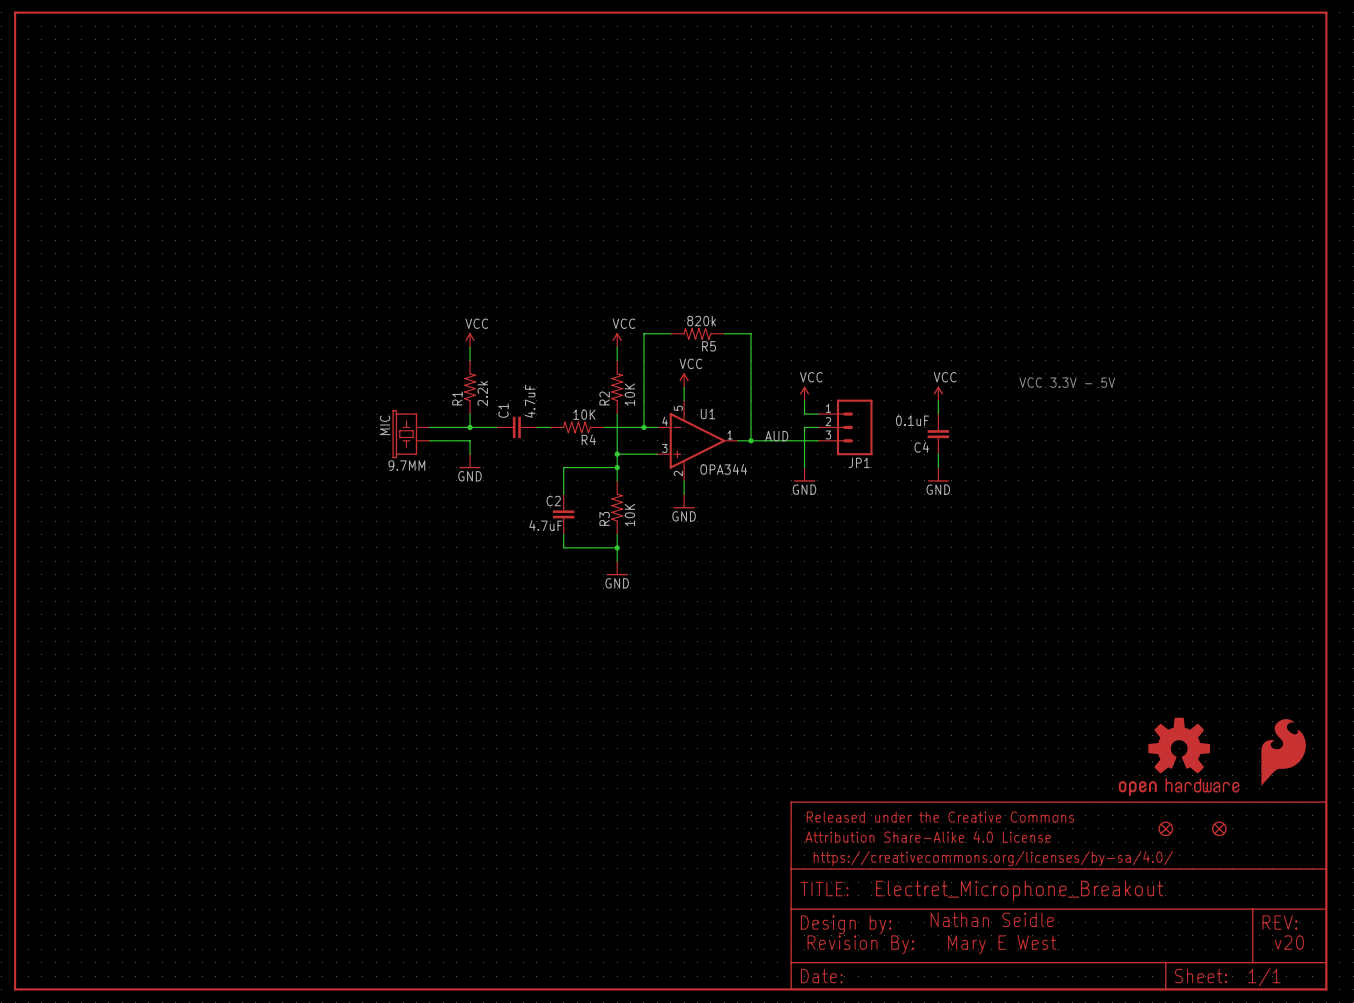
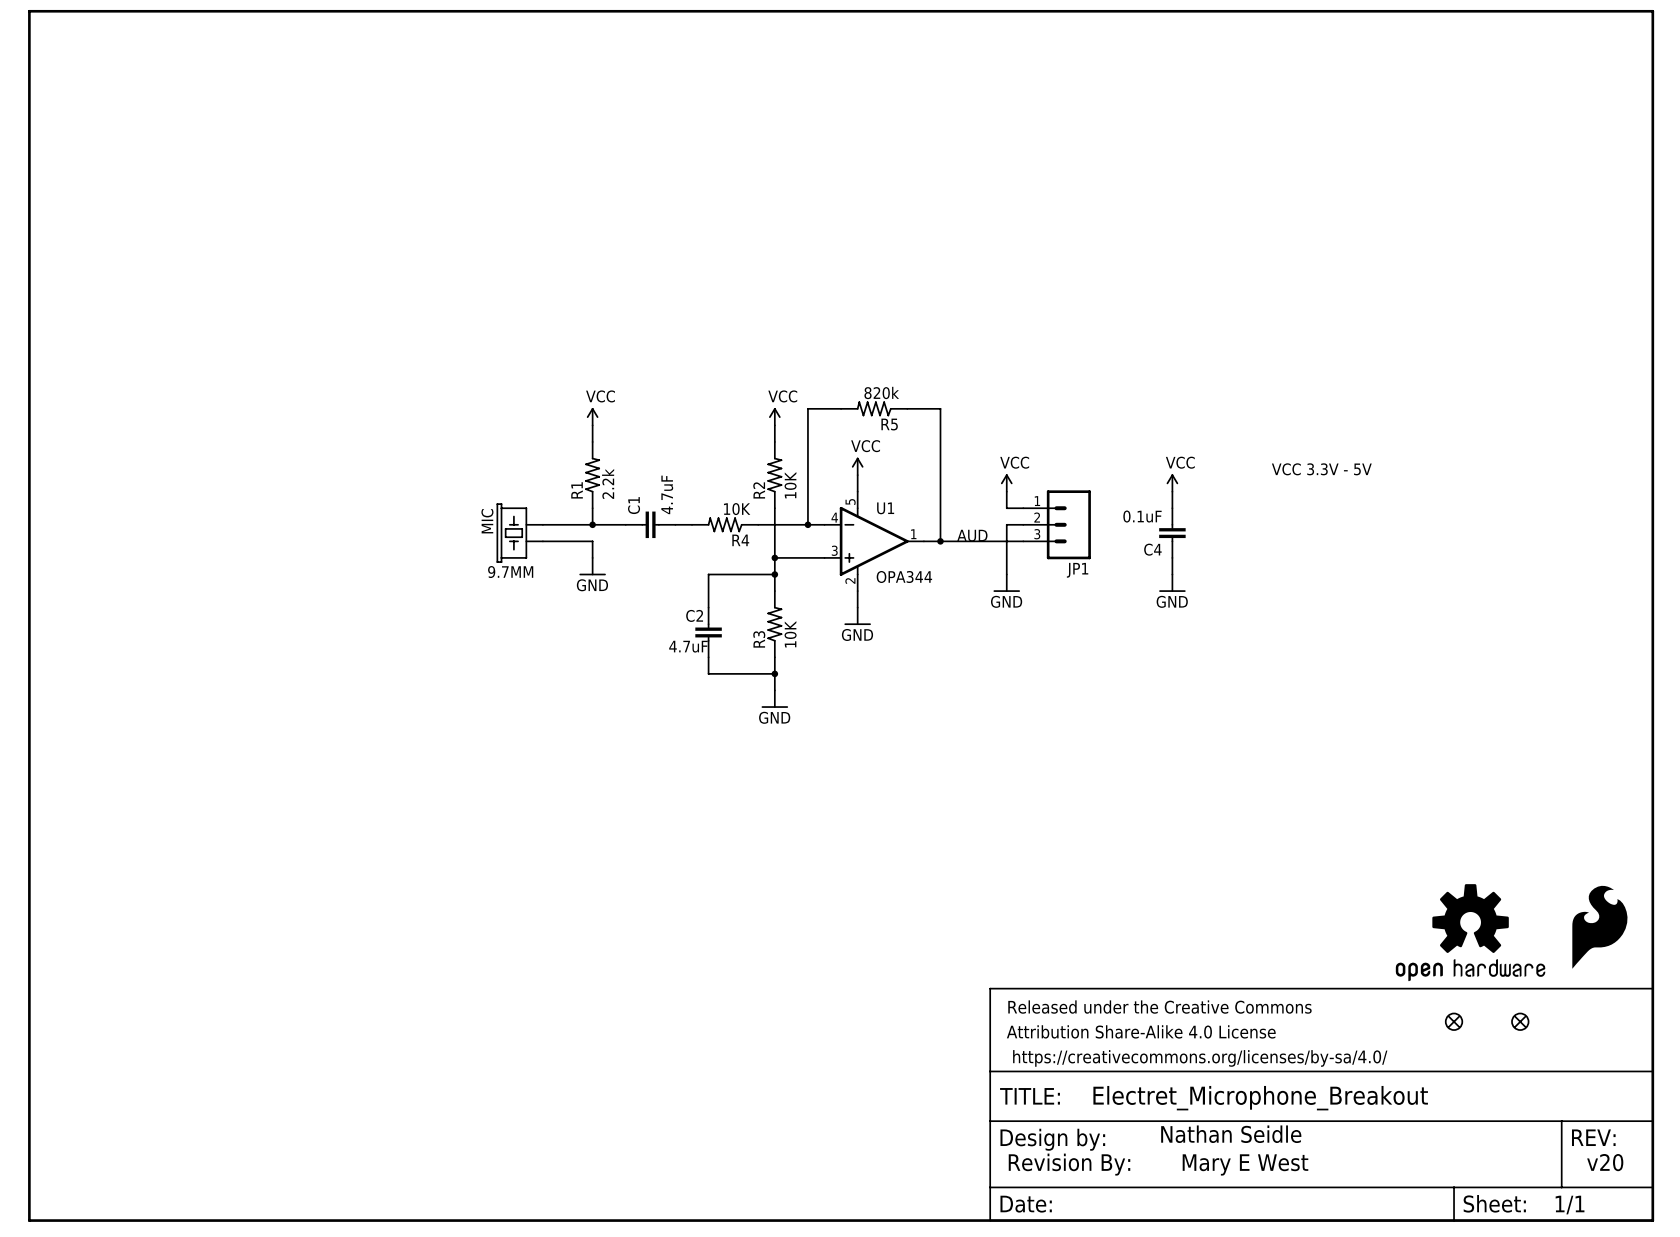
MIC text: none -> 9.7MM (510, 572)
MIC value: 9.7MM (406, 465) -> none

